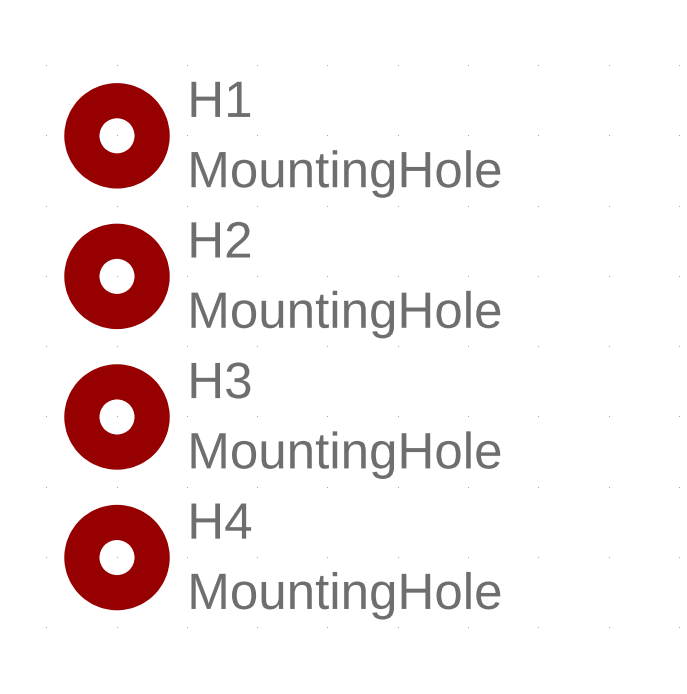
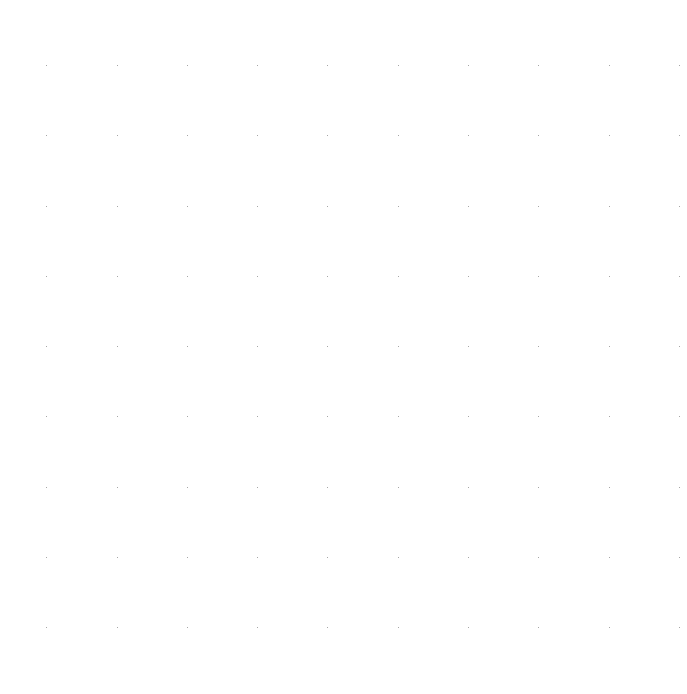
H1: MountingHole (117, 135) -> none
H2: MountingHole (117, 276) -> none
H3: MountingHole (117, 416) -> none
H4: MountingHole (117, 557) -> none

